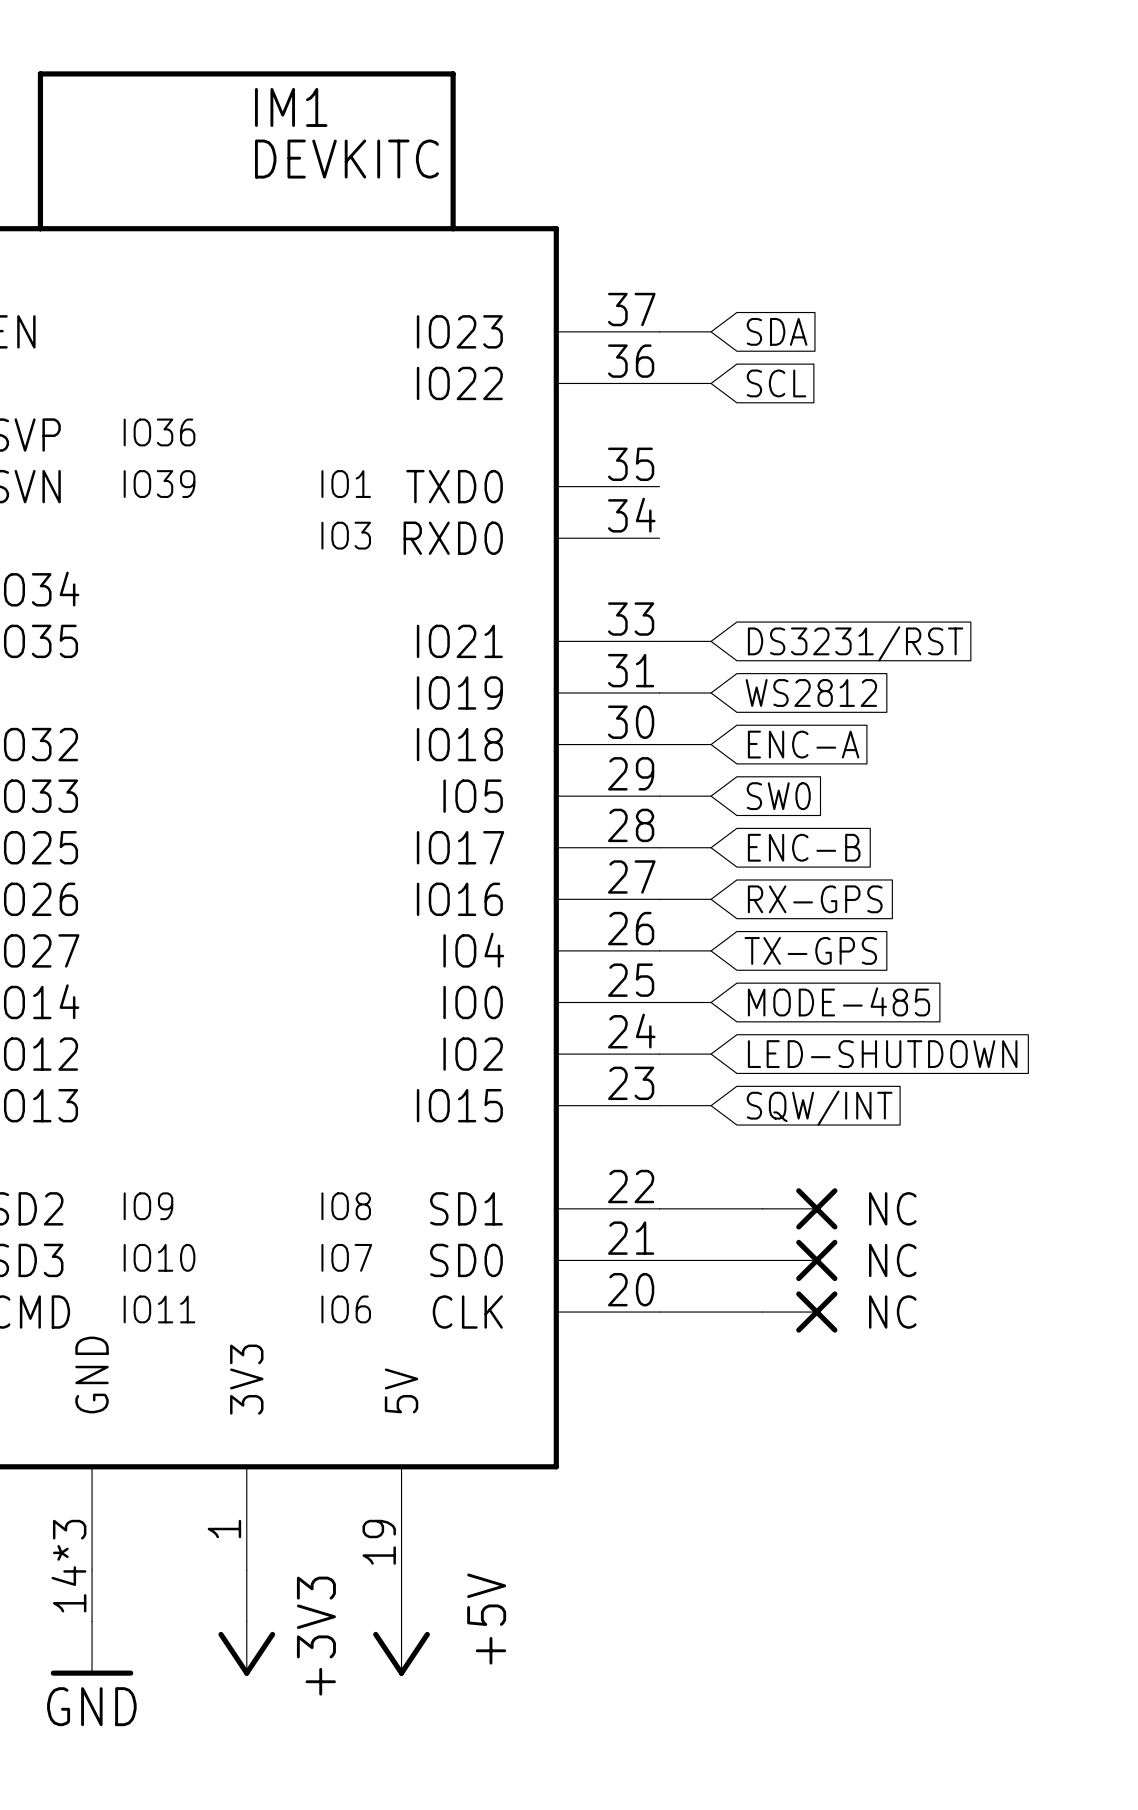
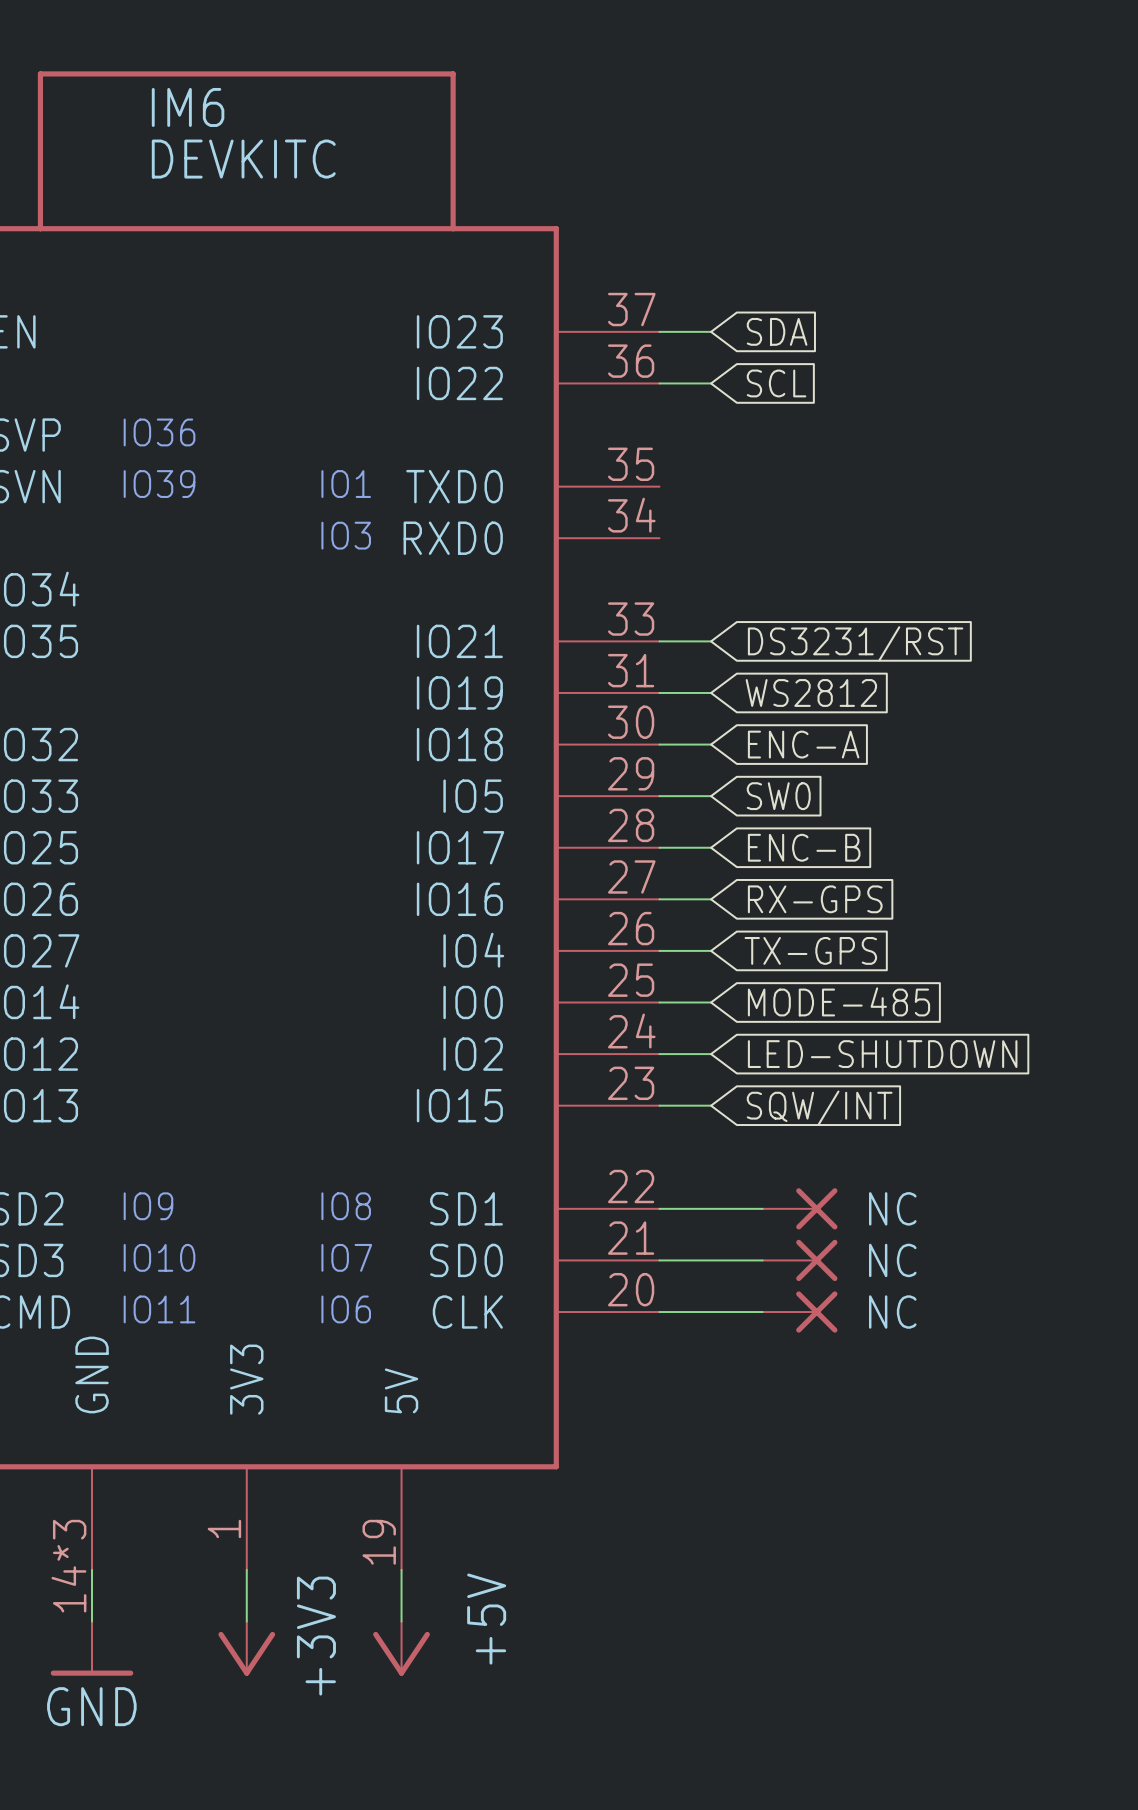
IM1 name: IM1 (291, 107) -> IM6 (188, 107)
IM1 value position: DEVKITC (346, 159) -> DEVKITC (243, 159)

